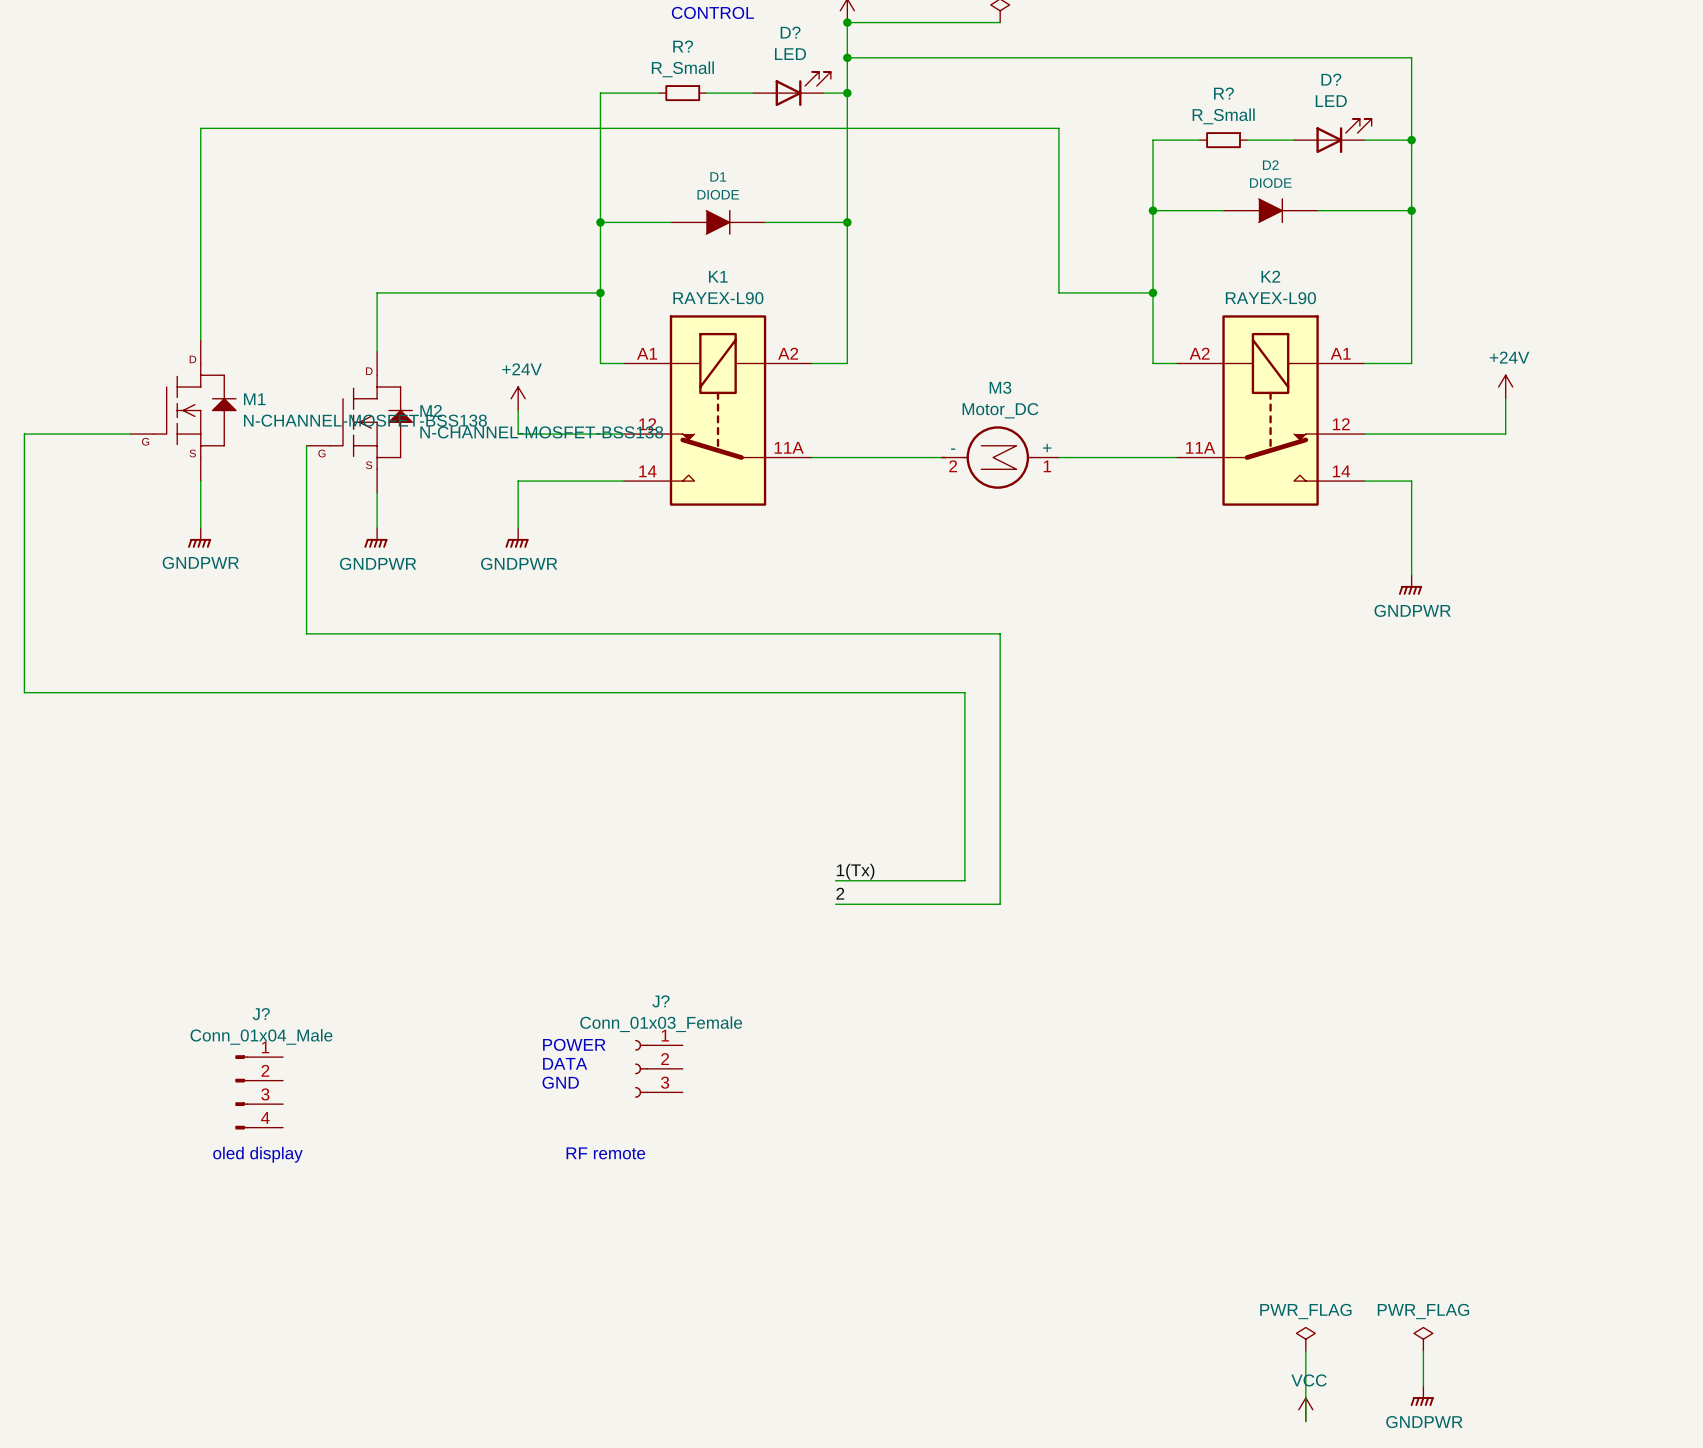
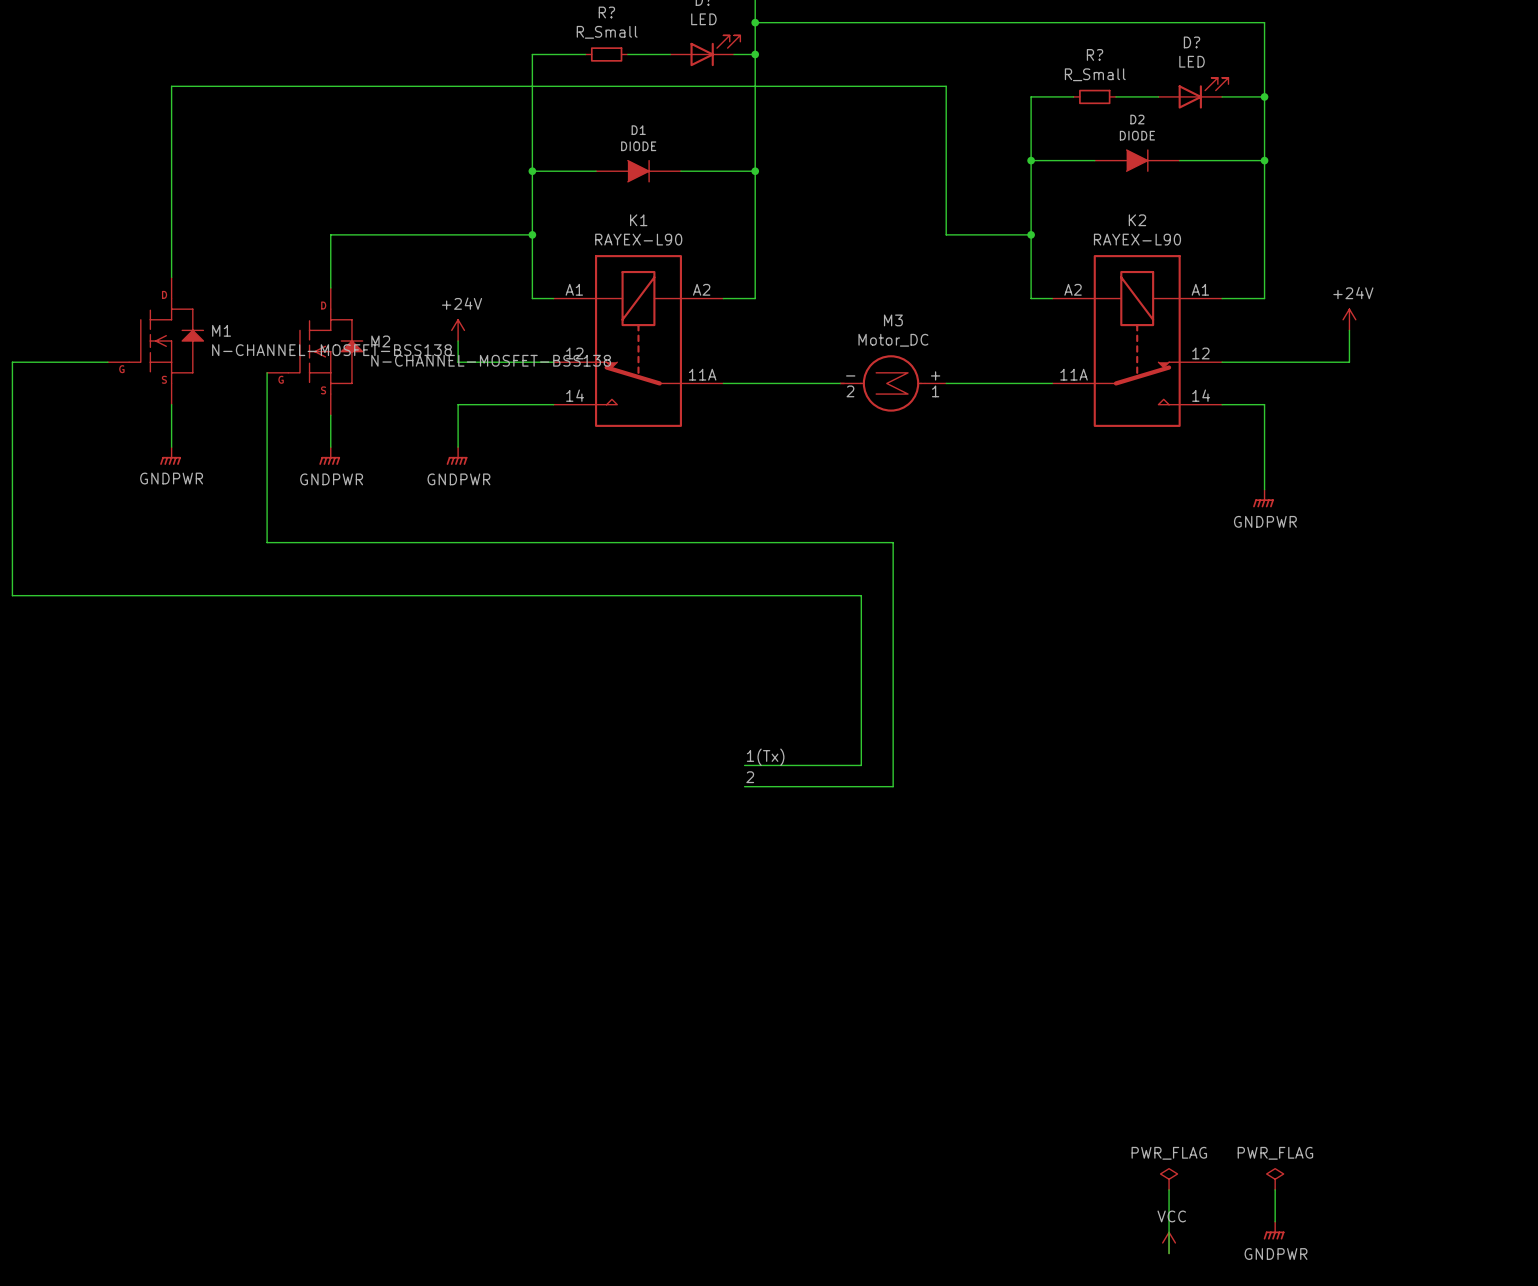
text: POWER (574, 1044) -> none
text: DATA (565, 1063) -> none
J?: Conn_01x03_Female (658, 1068) -> none
text: GND (560, 1082) -> none
J?: Conn_01x04_Male (259, 1092) -> none
text: RF remote (605, 1153) -> none
text: oled display (257, 1154) -> none

